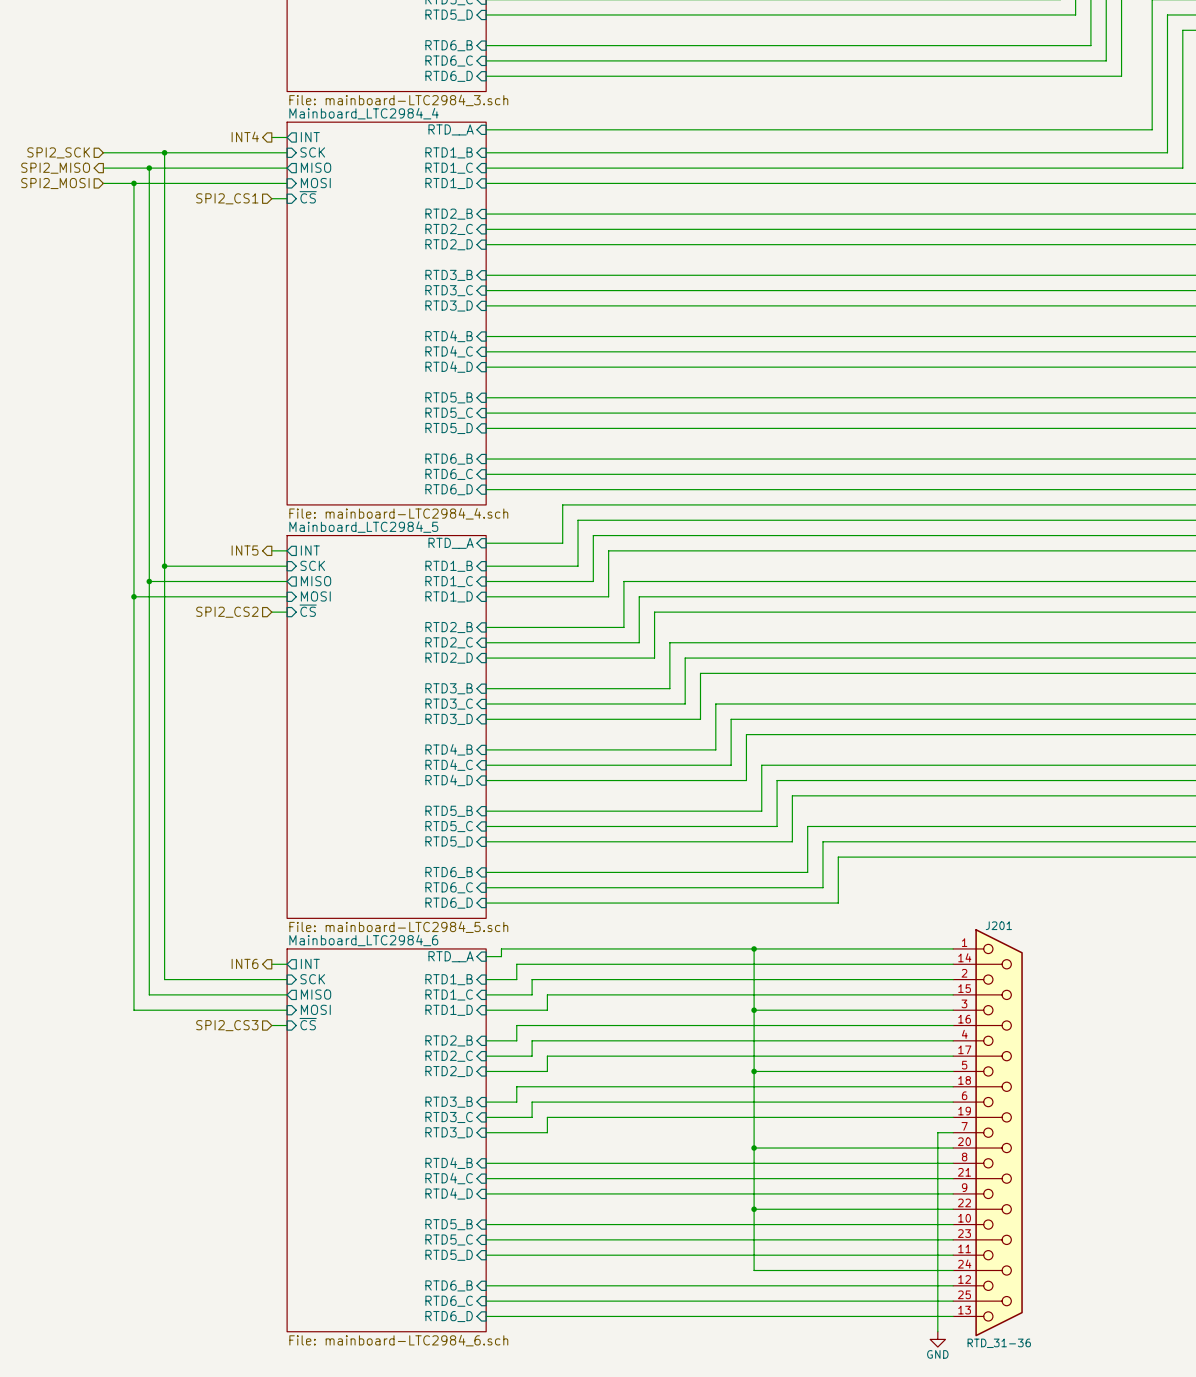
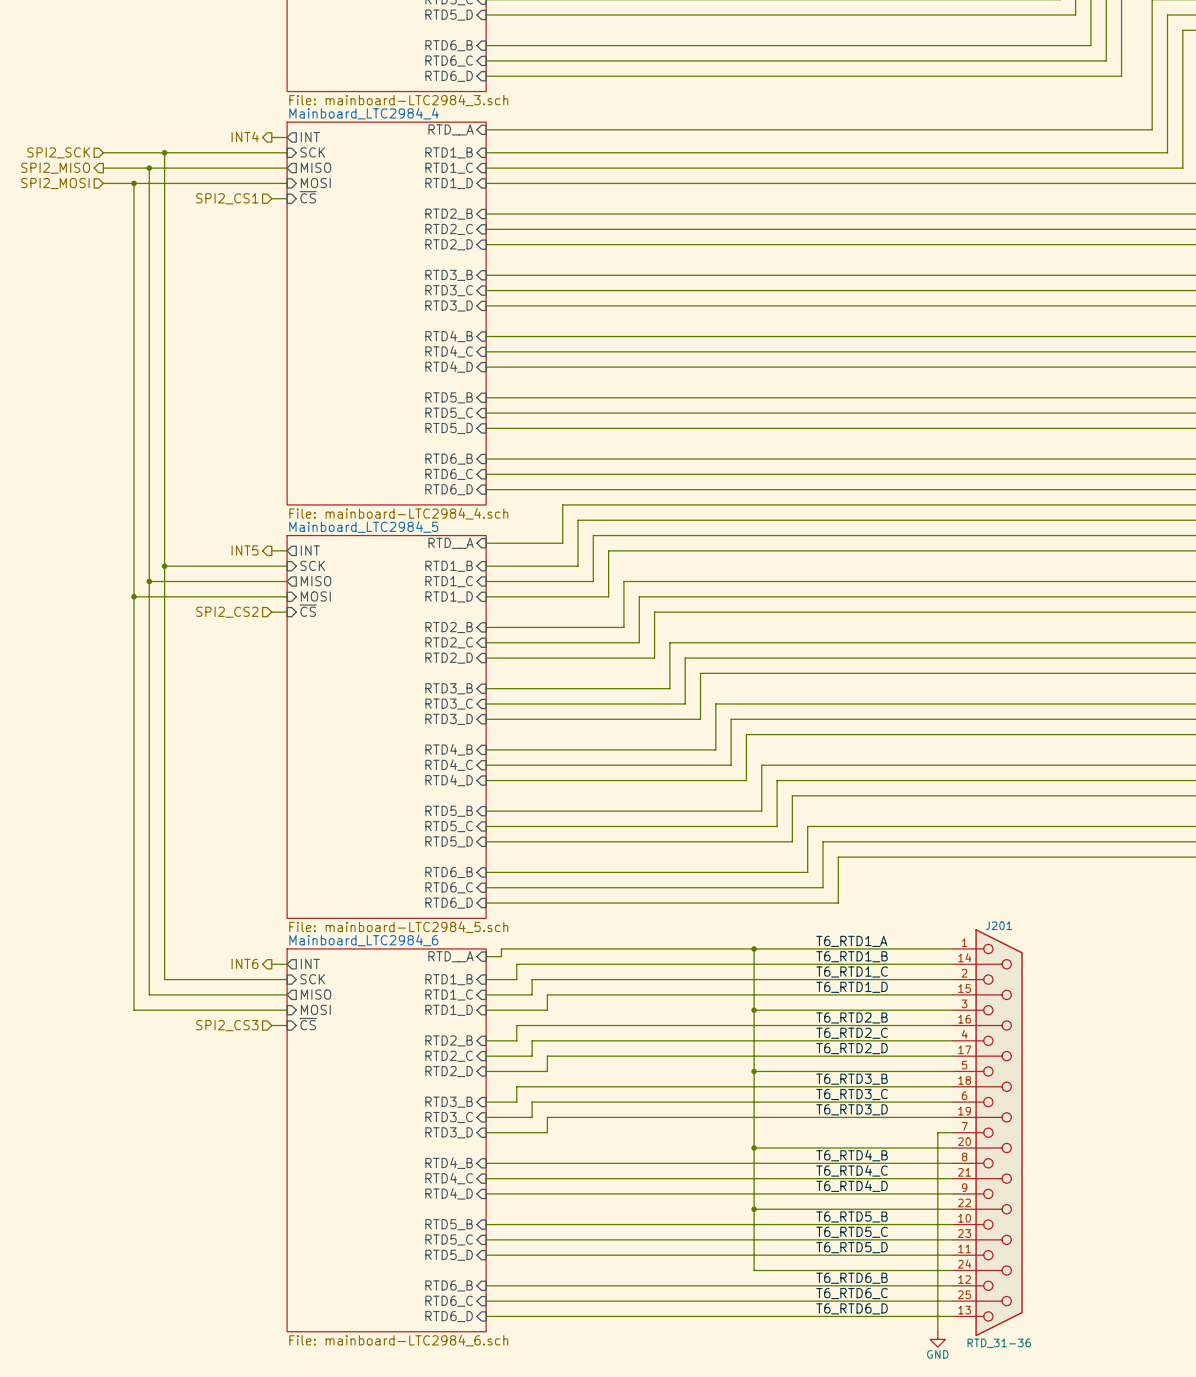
label: none -> T6_RTD1_A (851, 941)
label: none -> T6_RTD1_B (852, 956)
label: none -> T6_RTD1_C (852, 972)
label: none -> T6_RTD1_D (852, 987)
label: none -> T6_RTD2_B (852, 1017)
label: none -> T6_RTD2_C (852, 1033)
label: none -> T6_RTD2_D (852, 1048)
label: none -> T6_RTD3_B (852, 1079)
label: none -> T6_RTD3_C (852, 1094)
label: none -> T6_RTD3_D (852, 1109)
label: none -> T6_RTD4_B (852, 1155)
label: none -> T6_RTD4_C (852, 1170)
label: none -> T6_RTD4_D (852, 1186)
label: none -> T6_RTD5_B (852, 1216)
label: none -> T6_RTD5_C (852, 1232)
label: none -> T6_RTD5_D (852, 1247)
label: none -> T6_RTD6_B (852, 1278)
label: none -> T6_RTD6_C (852, 1293)
label: none -> T6_RTD6_D (852, 1308)

